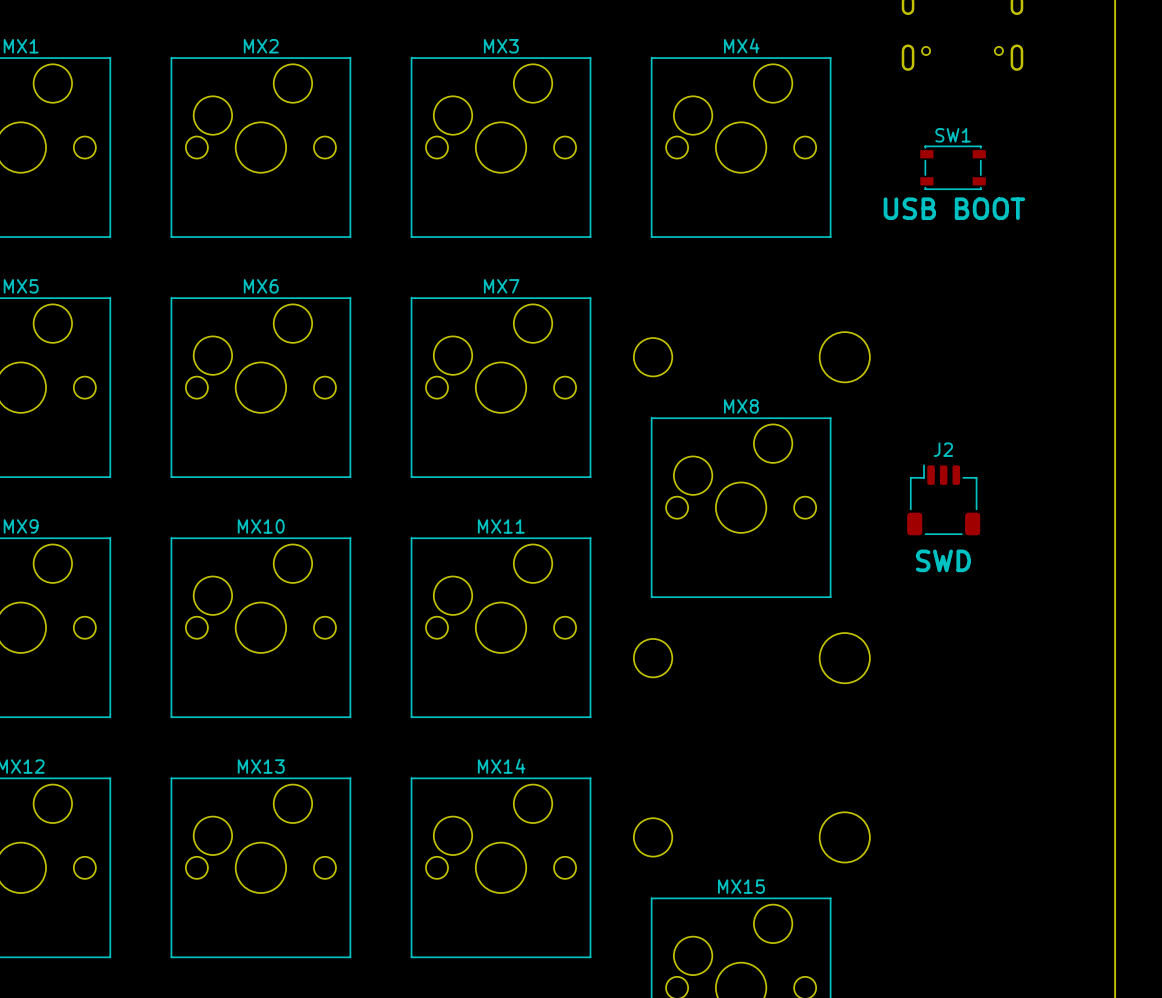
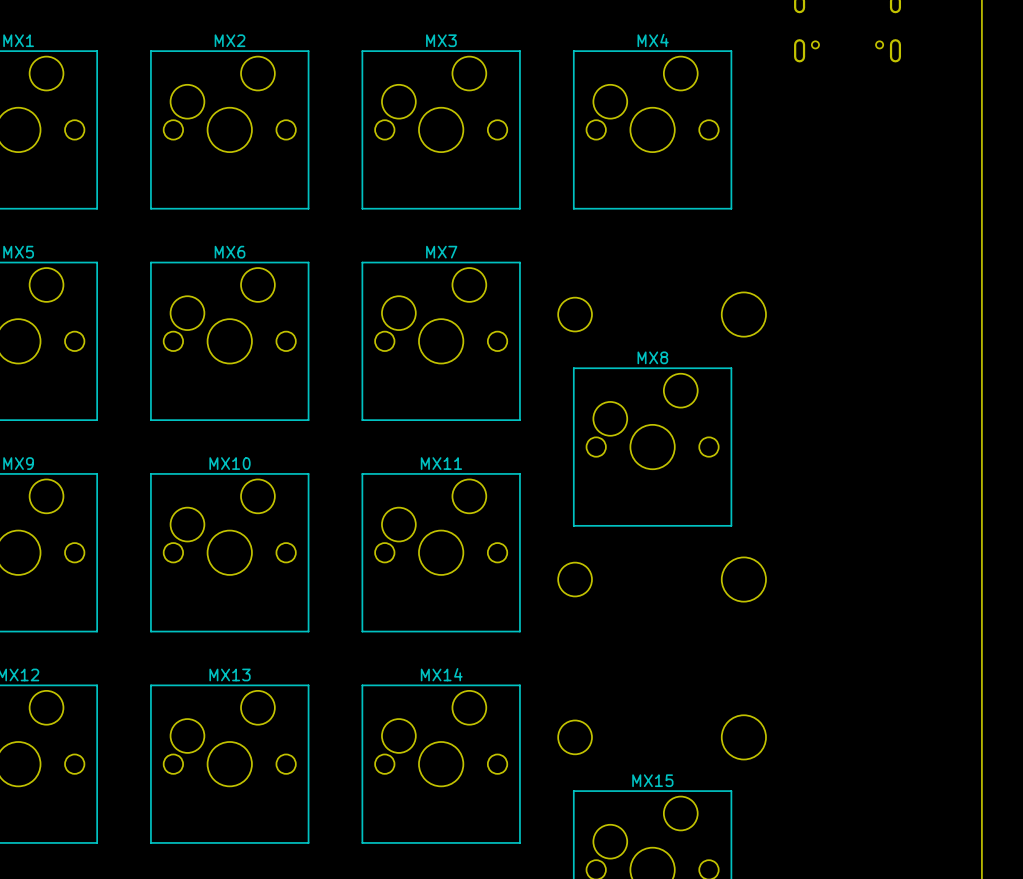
SW1: (953, 167) -> none
text: USB BOOT (954, 208) -> none
J2: (943, 499) -> none
text: SWD (943, 560) -> none

